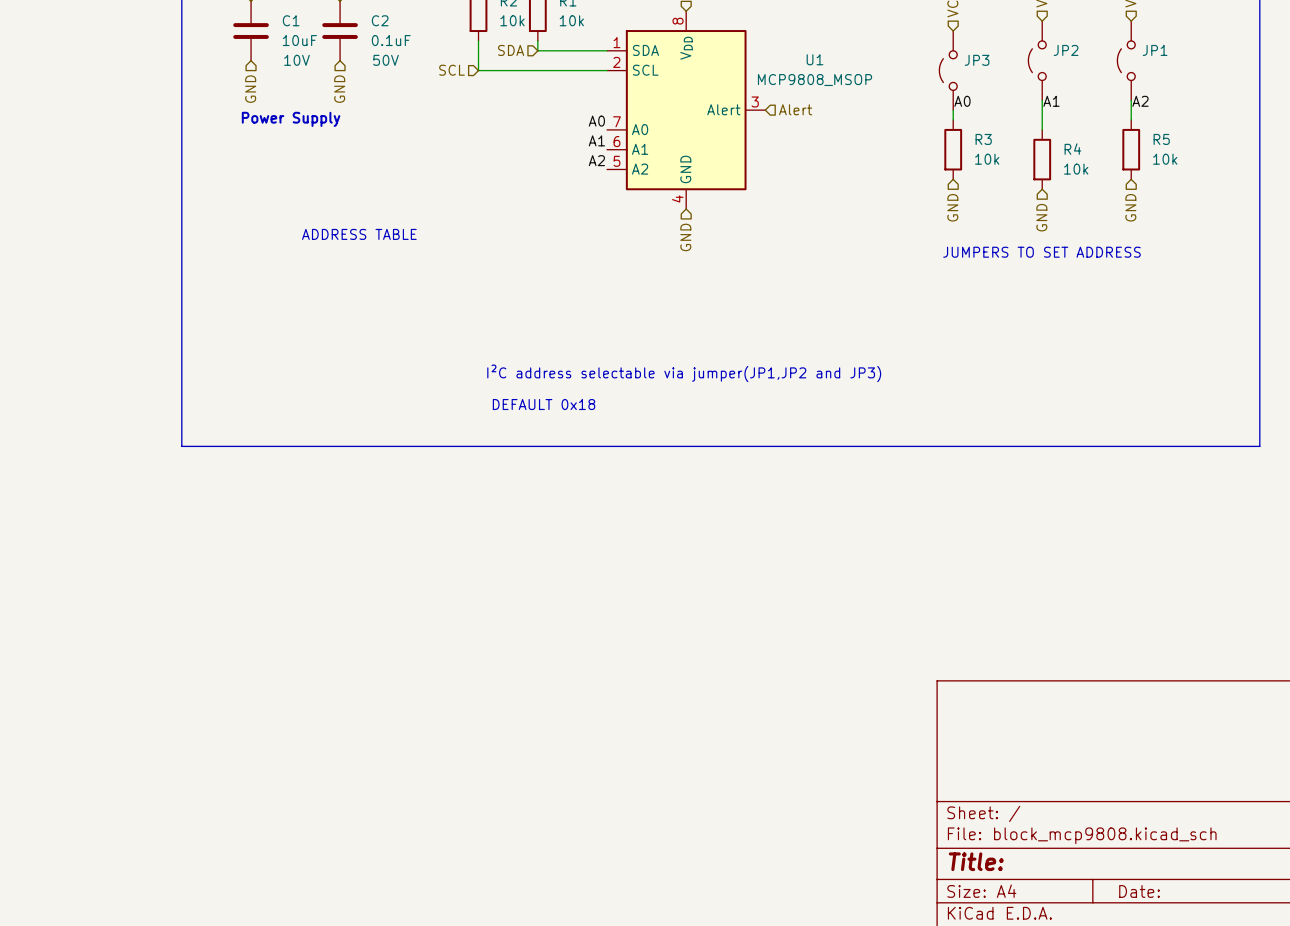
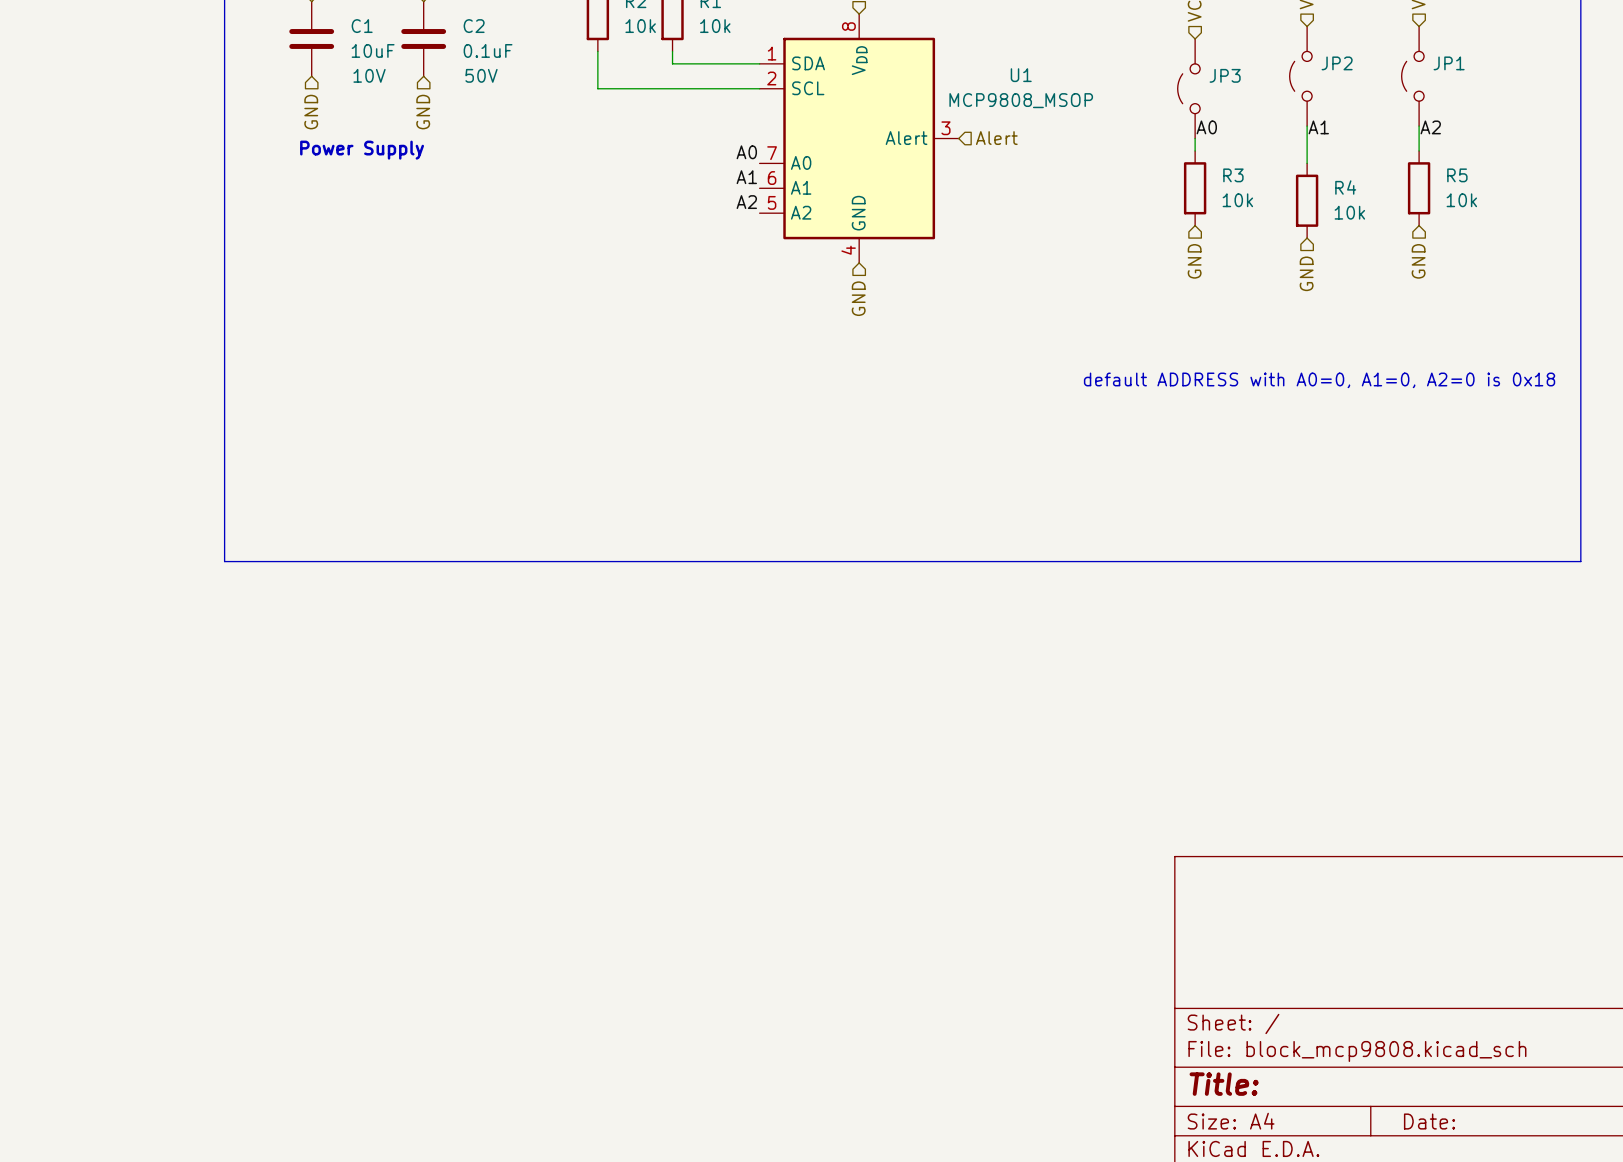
hierarchical label: SDA (511, 50) -> none
hierarchical label: SCL (451, 70) -> none
text: ADDRESS TABLE (359, 234) -> none
text: JUMPERS TO SET ADDRESS (1041, 252) -> none
text: none -> default ADDRESS with A0=0, A1=0, A2=0 is 0x18 (1319, 380)
text: I²C address selectable via jumper(JP1,JP2 and JP3) (684, 373) -> none
text: DEFAULT 0x18 (544, 404) -> none

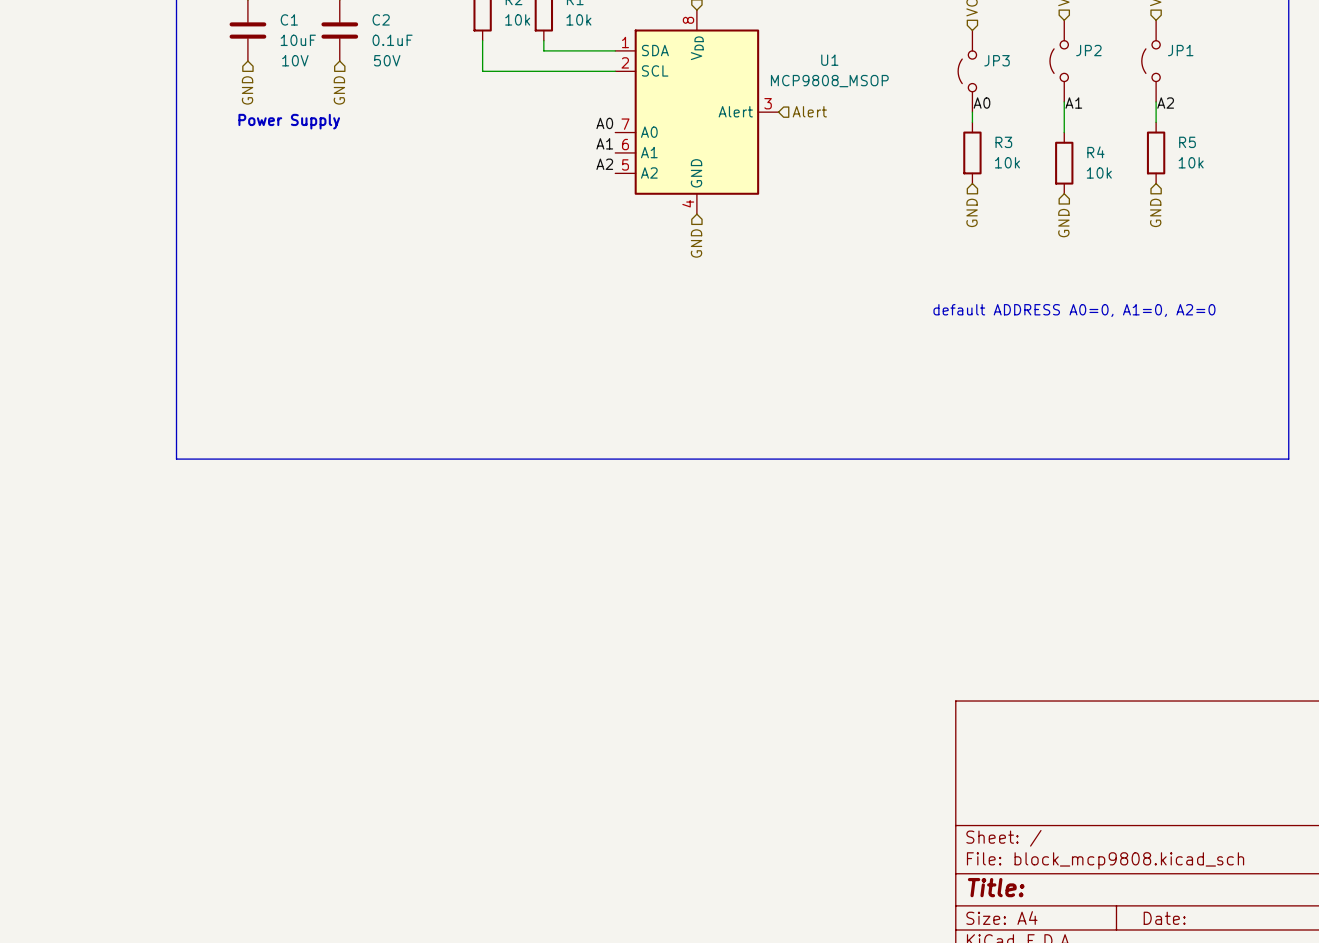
text: default ADDRESS with A0=0, A1=0, A2=0 is 0x18 (1319, 380) -> default ADDRESS A0=0, A1=0, A2=0 (1074, 310)

